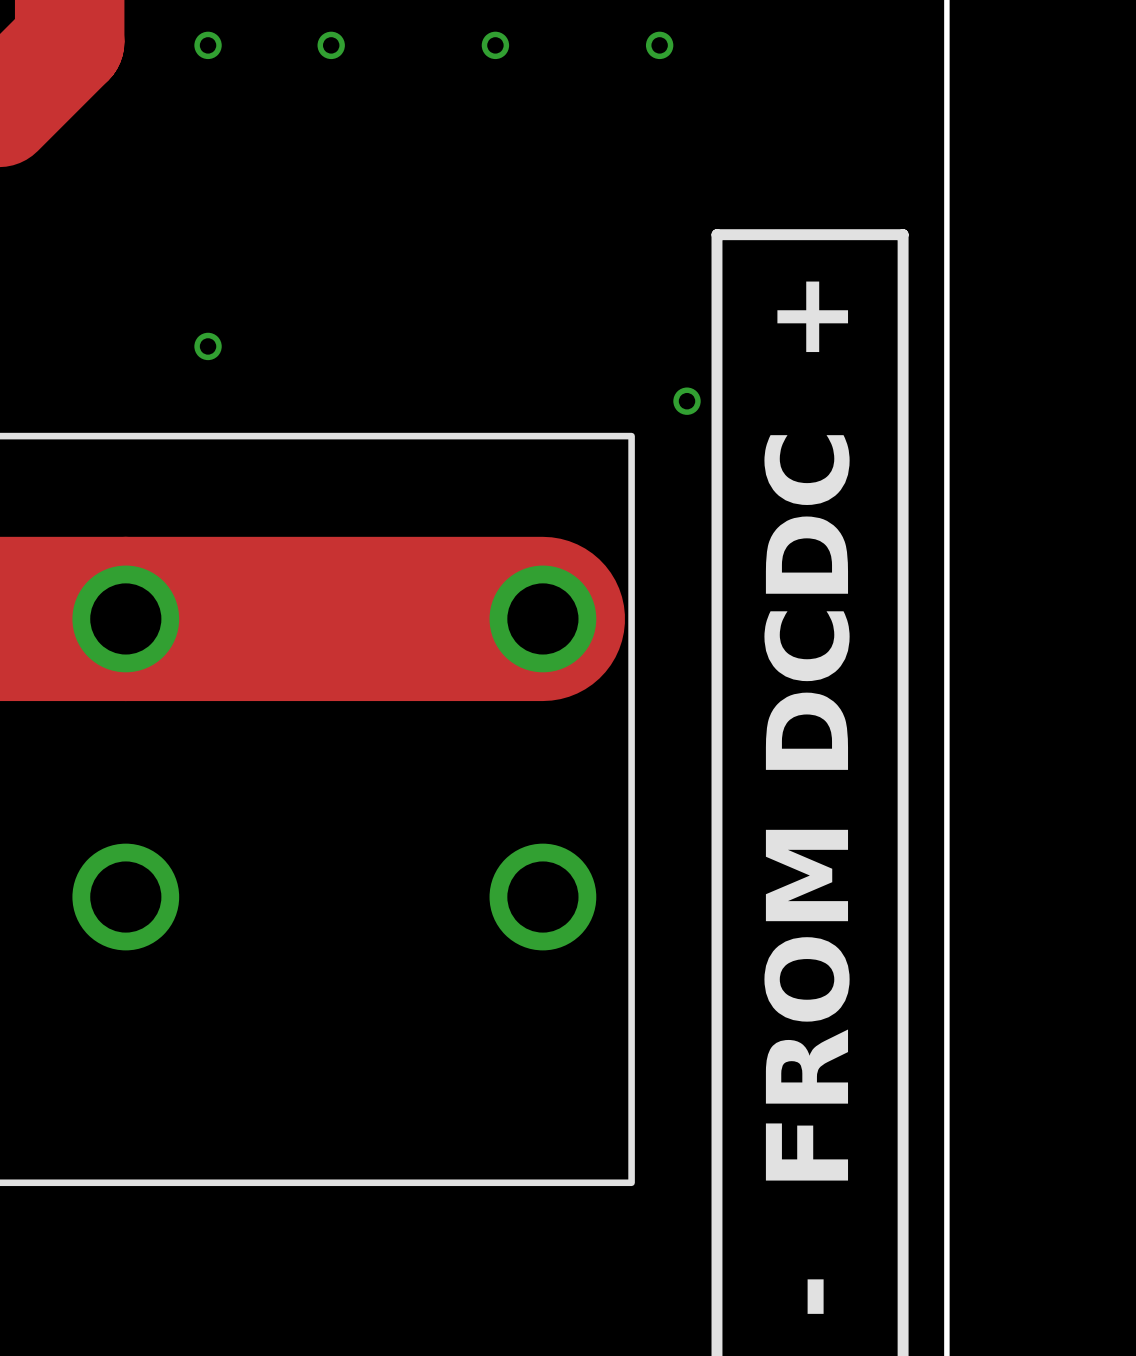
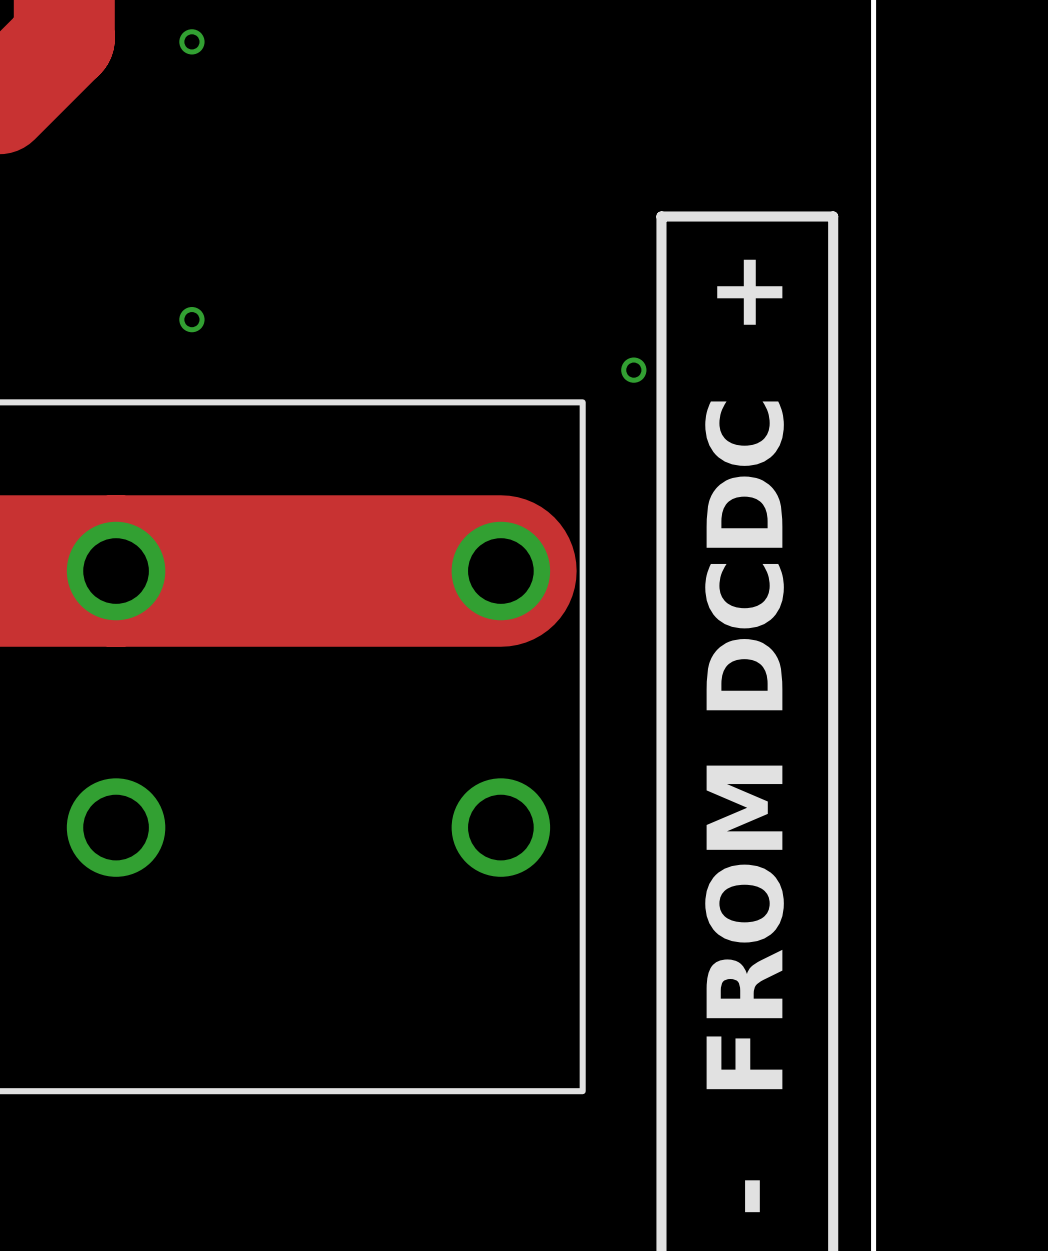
via: (331, 45) -> none
via: (495, 45) -> none
via: (659, 45) -> none

